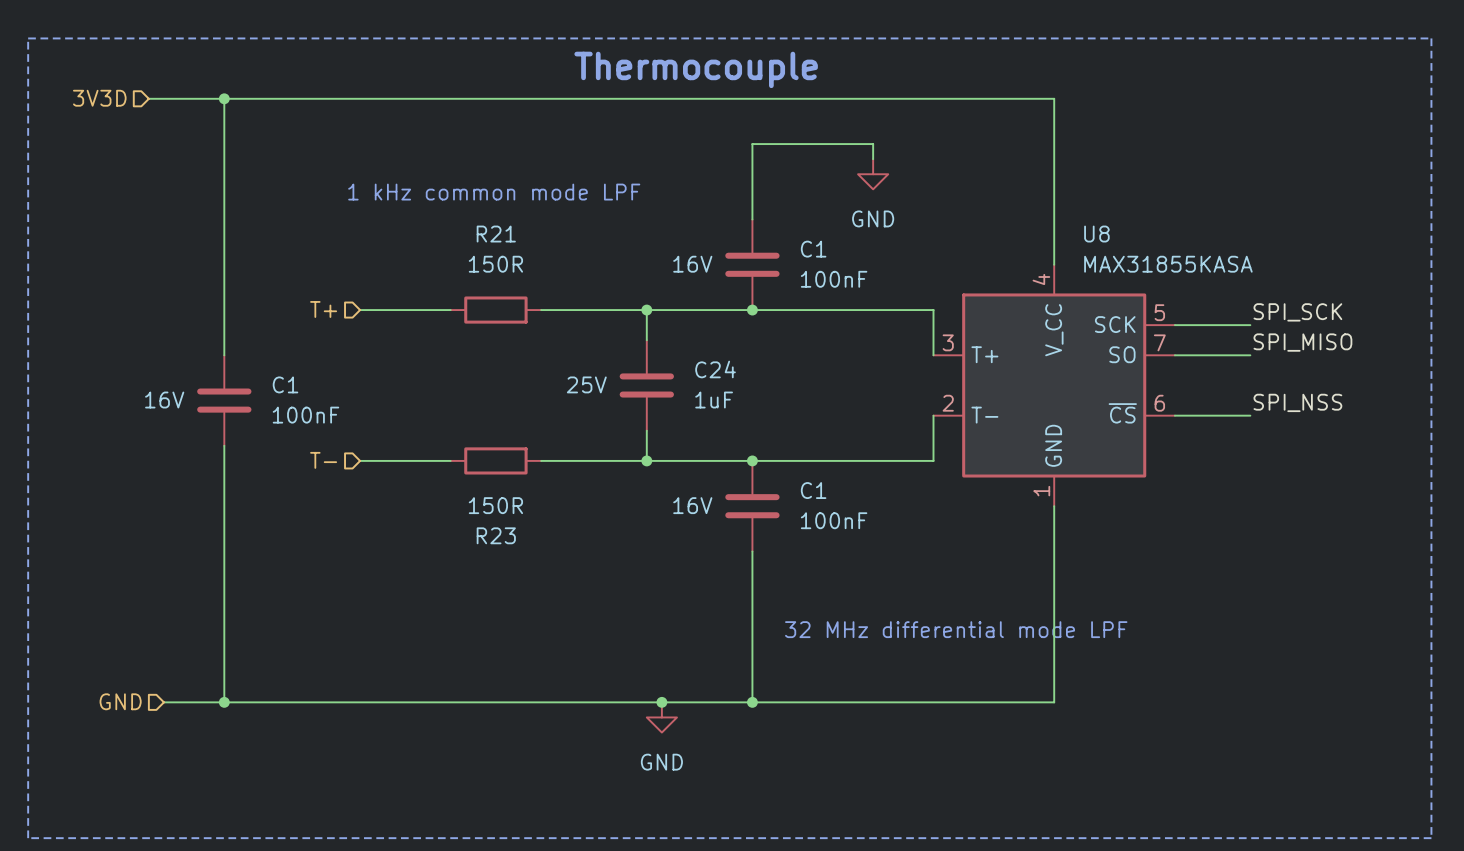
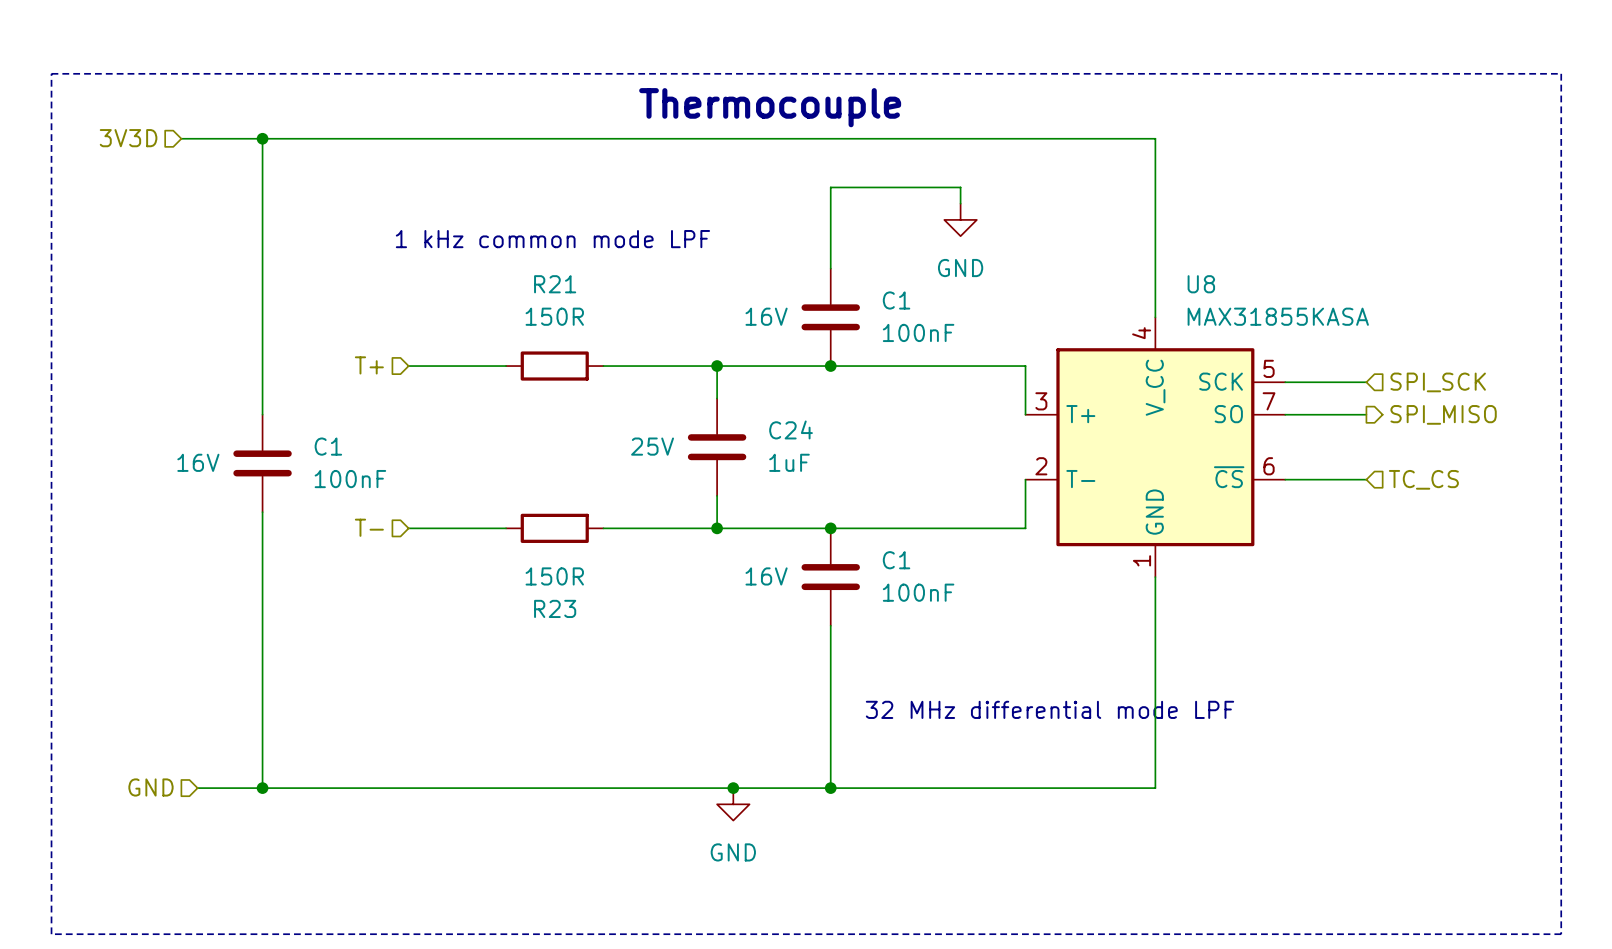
label: SPI_SCK (1297, 312) -> none
hierarchical label: none -> SPI_SCK (1438, 382)
label: SPI_MISO (1302, 342) -> none
hierarchical label: none -> SPI_MISO (1443, 414)
label: SPI_NSS (1297, 402) -> none
hierarchical label: none -> TC_CS (1423, 479)

